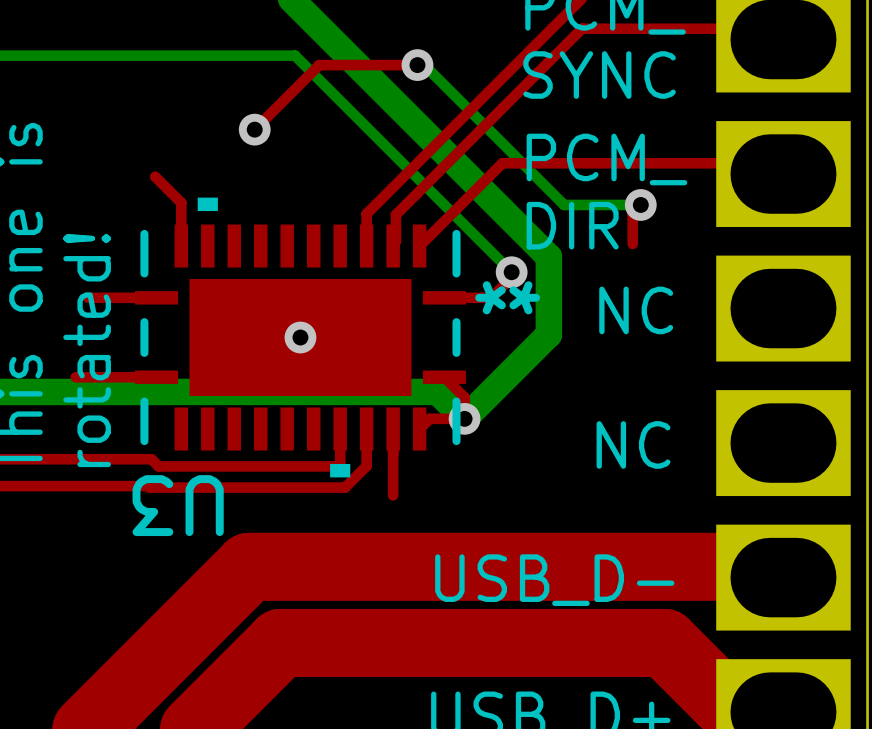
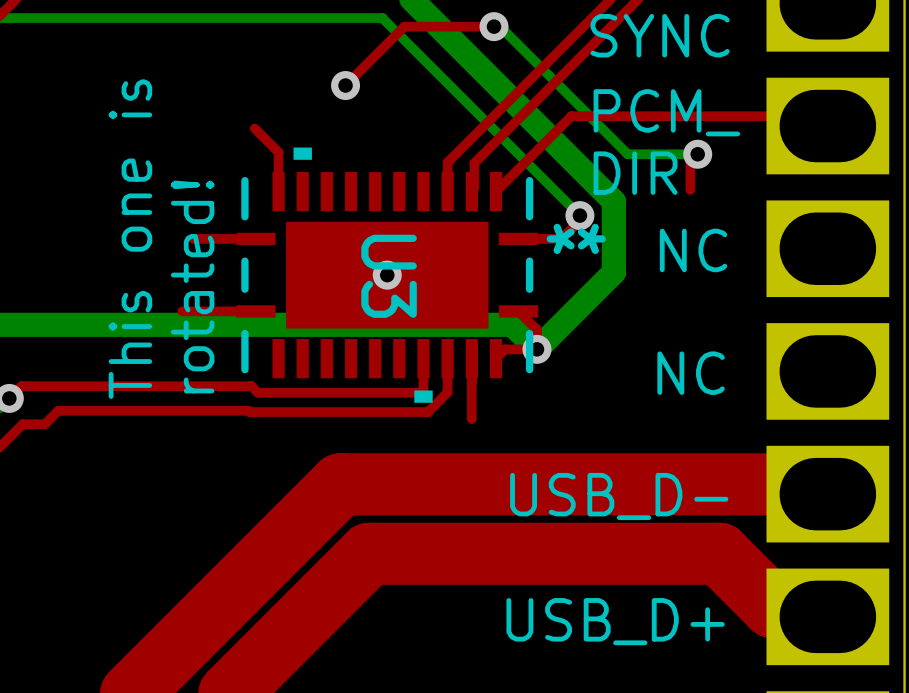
U3 name rotation: 0° (178, 505) -> 90° counterclockwise (389, 276)
U3 name position: U3 (178, 505) -> U3 (389, 276)

